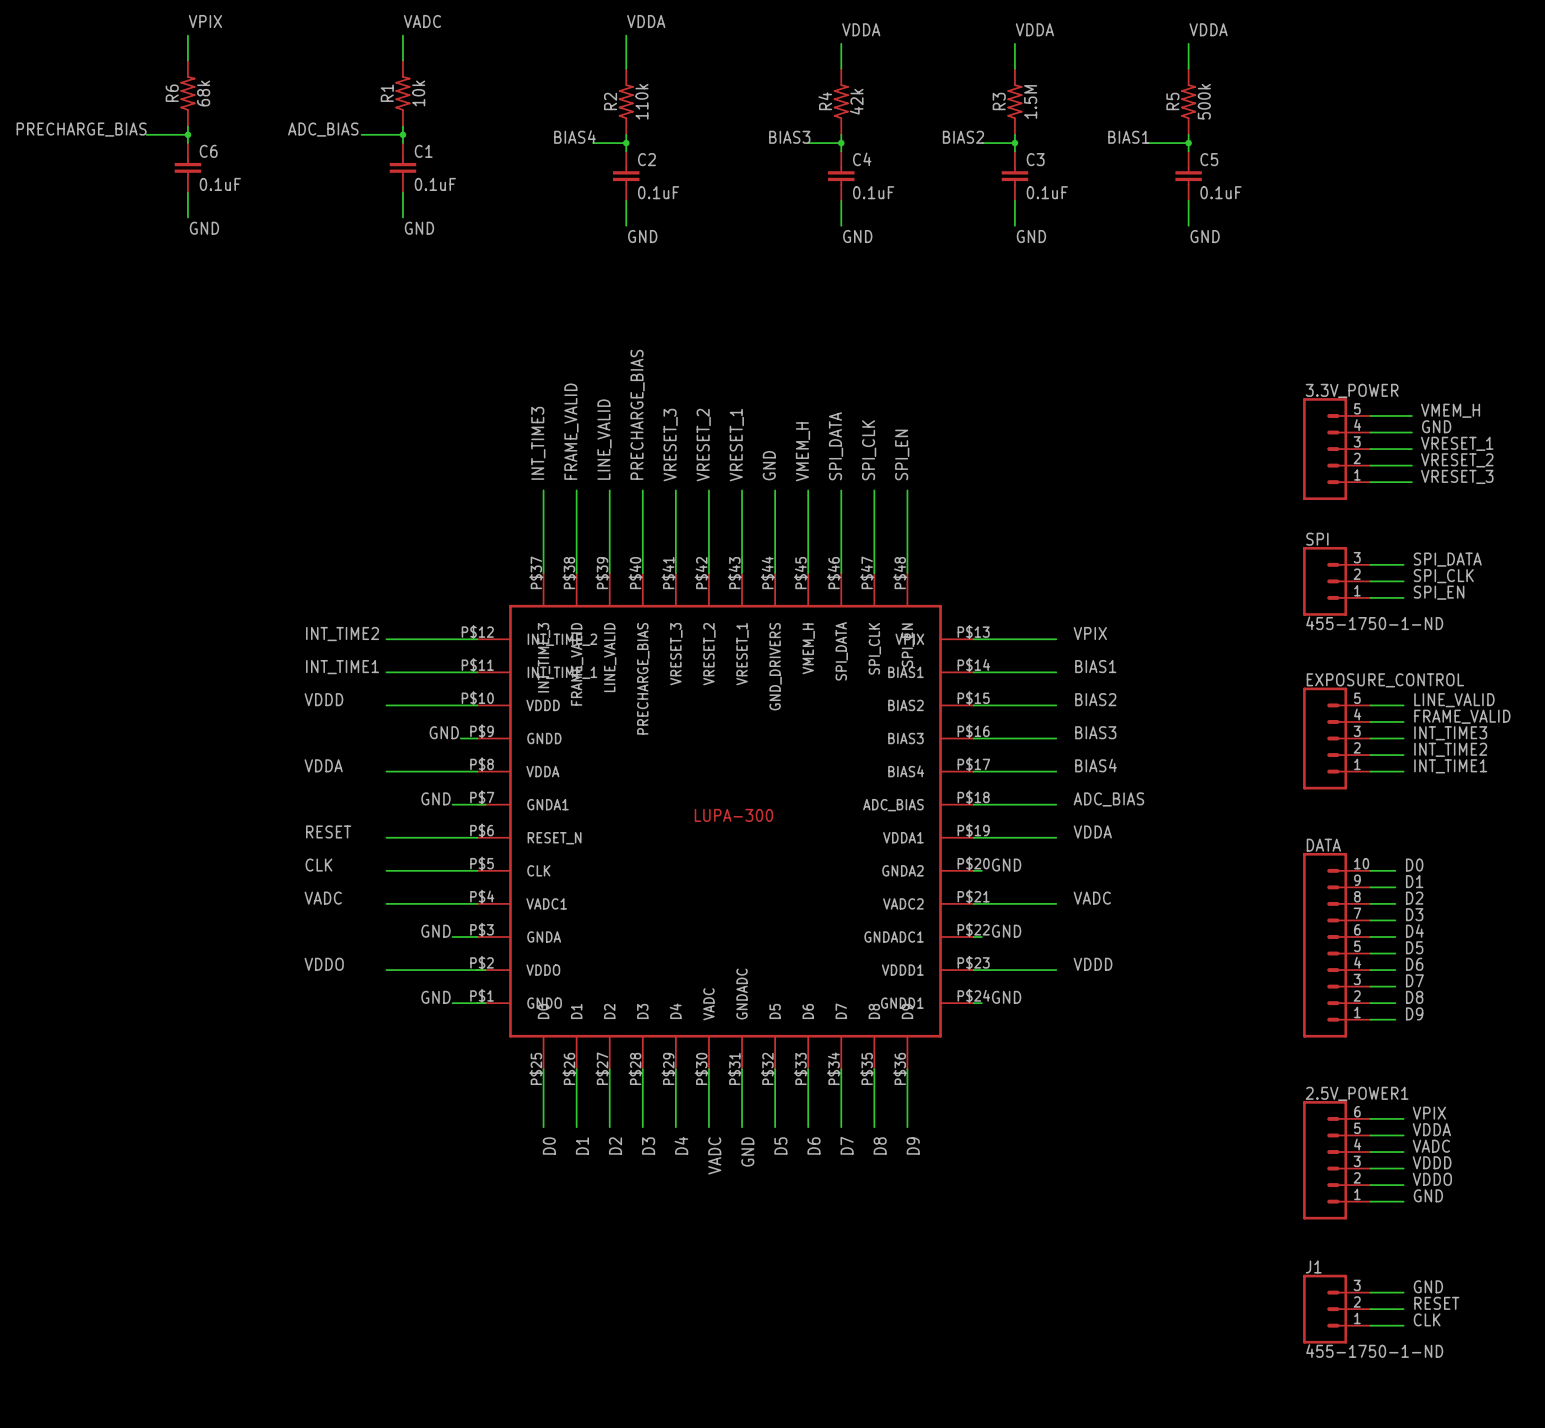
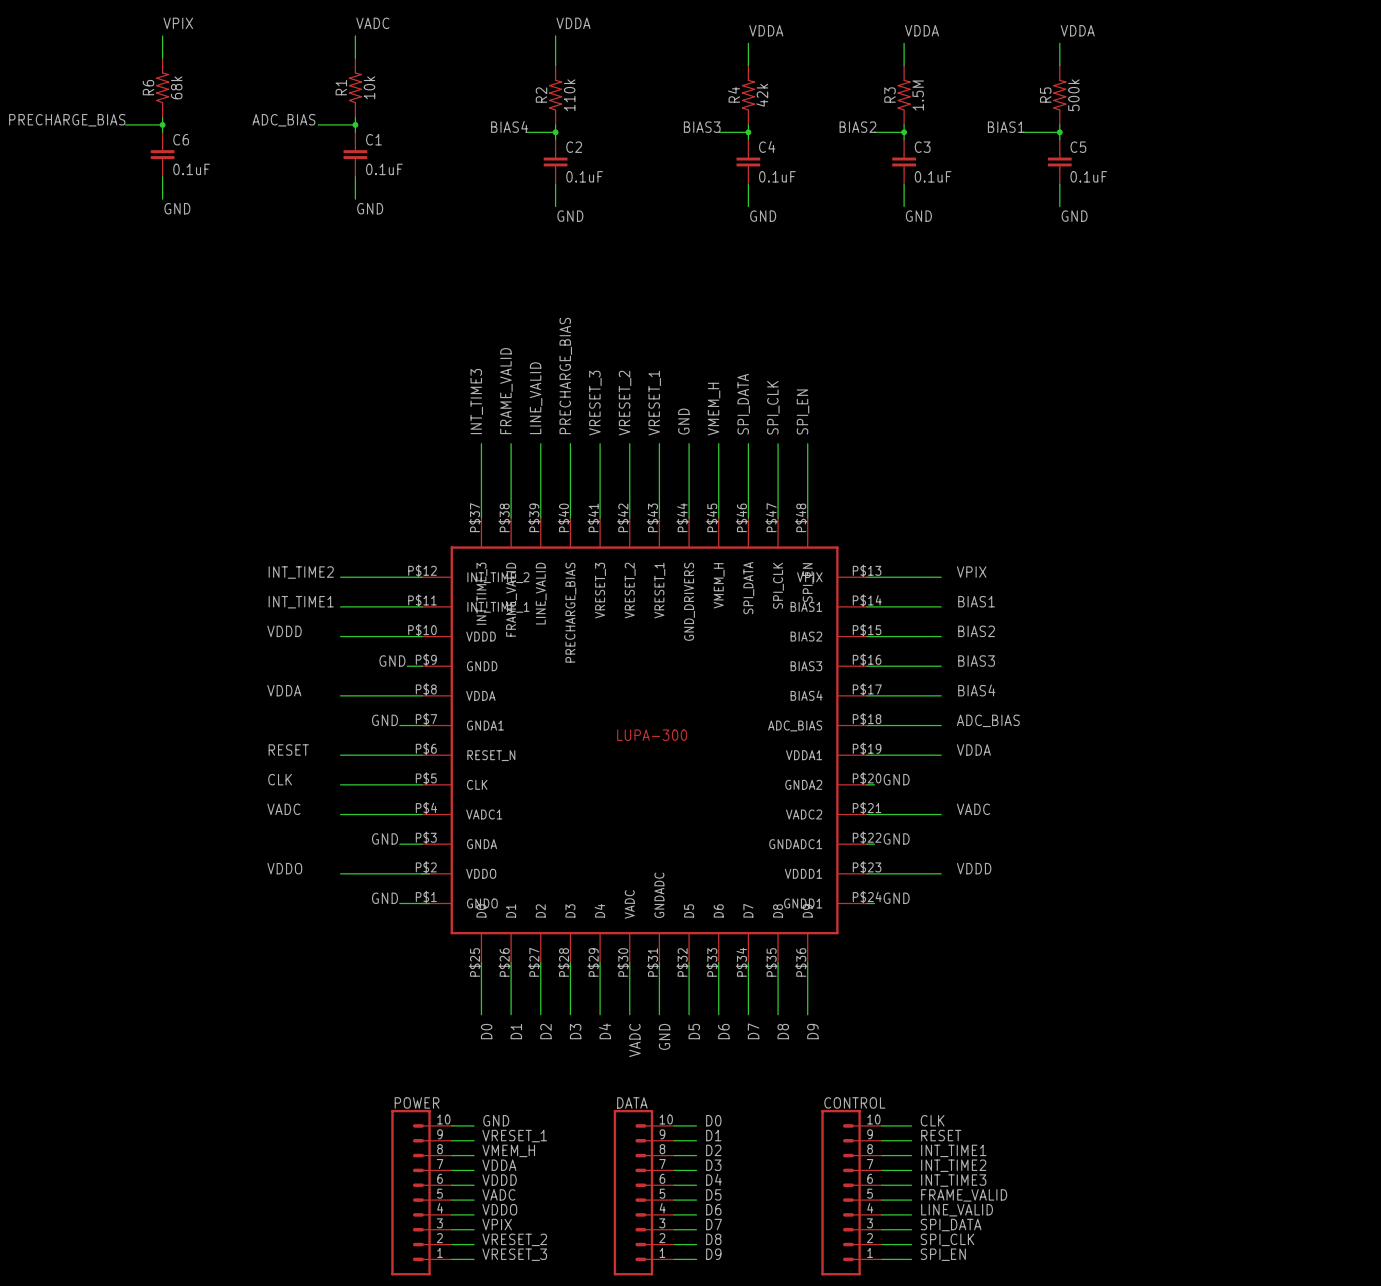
label: VMEM_H (1450, 410) -> none
wire: (1370, 415) (1411, 415) -> none
label: GND (1436, 426) -> none
wire: (1370, 432) (1411, 432) -> none
label: VRESET_1 (1457, 443) -> none
3.3V_POWER: (1336, 449) -> none
wire: (1370, 449) (1411, 449) -> none
label: VRESET_2 (1457, 460) -> none
wire: (1370, 465) (1411, 465) -> none
label: VRESET_3 (1457, 476) -> none
wire: (1370, 482) (1411, 482) -> none
label: SPI_DATA (1447, 559) -> none
wire: (1370, 564) (1403, 564) -> none
label: SPI_CLK (1443, 576) -> none
SPI: 455-1750-1-ND (1336, 581) -> none
wire: (1370, 581) (1403, 581) -> none
label: SPI_EN (1439, 592) -> none
wire: (1370, 597) (1403, 597) -> none
label: LINE_VALID (1454, 700) -> none
wire: (1370, 705) (1403, 705) -> none
label: FRAME_VALID (1462, 716) -> none
wire: (1370, 721) (1403, 721) -> none
label: INT_TIME3 (1450, 733) -> none
EXPOSURE_CONTROL: (1336, 738) -> none
wire: (1370, 738) (1403, 738) -> none
label: INT_TIME2 (1450, 749) -> none
wire: (1370, 755) (1403, 755) -> none
label: INT_TIME1 (1450, 766) -> none
wire: (1370, 771) (1403, 771) -> none
label: D0 (1414, 865) -> none
wire: (1370, 870) (1395, 870) -> none
label: D1 (1414, 881) -> none
wire: (1370, 887) (1395, 887) -> none
label: D2 (1414, 898) -> none
wire: (1370, 903) (1395, 903) -> none
label: D3 (1414, 914) -> none
wire: (1370, 920) (1395, 920) -> none
label: D4 (1414, 930) -> none
wire: (1370, 936) (1395, 936) -> none
DATA: (1336, 945) -> none
label: D5 (1414, 947) -> none
wire: (1370, 953) (1395, 953) -> none
label: D6 (1414, 964) -> none
wire: (1370, 970) (1395, 970) -> none
label: D7 (1414, 980) -> none
wire: (1370, 986) (1395, 986) -> none
label: D8 (1414, 997) -> none
wire: (1370, 1003) (1395, 1003) -> none
label: D9 (1414, 1013) -> none
wire: (1370, 1019) (1395, 1019) -> none
label: VPIX (1429, 1113) -> none
wire: (1370, 1118) (1403, 1118) -> none
label: VDDA (1431, 1129) -> none
wire: (1370, 1135) (1403, 1135) -> none
label: VADC (1431, 1146) -> none
wire: (1370, 1152) (1403, 1152) -> none
2.5V_POWER1: (1336, 1160) -> none
label: VDDD (1432, 1162) -> none
wire: (1370, 1168) (1403, 1168) -> none
label: VDDO (1432, 1179) -> none
wire: (1370, 1185) (1403, 1185) -> none
label: GND (1428, 1195) -> none
wire: (1370, 1201) (1403, 1201) -> none
label: none -> GND (496, 1120)
label: none -> D0 (713, 1120)
label: none -> CLK (932, 1120)
wire: none -> (451, 1125) (474, 1125)
wire: none -> (674, 1125) (696, 1125)
wire: none -> (881, 1125) (911, 1125)
label: none -> VRESET_1 (514, 1136)
label: none -> D1 (713, 1135)
label: none -> RESET (941, 1135)
wire: none -> (451, 1140) (474, 1140)
wire: none -> (674, 1140) (696, 1140)
wire: none -> (881, 1140) (911, 1140)
label: none -> D2 (713, 1150)
label: none -> VMEM_H (508, 1150)
label: none -> INT_TIME1 (953, 1150)
wire: none -> (451, 1155) (474, 1155)
wire: none -> (674, 1155) (696, 1155)
wire: none -> (881, 1155) (911, 1155)
label: GND (1428, 1286) -> none
wire: (1370, 1292) (1403, 1292) -> none
label: none -> VDDA (499, 1165)
label: none -> D3 (713, 1165)
label: none -> INT_TIME2 (953, 1165)
wire: none -> (451, 1170) (474, 1170)
wire: none -> (674, 1170) (696, 1170)
wire: none -> (881, 1170) (911, 1170)
label: RESET (1436, 1303) -> none
J1: 455-1750-1-ND (1336, 1309) -> none
wire: (1370, 1309) (1403, 1309) -> none
label: none -> VDDD (499, 1180)
label: none -> D4 (714, 1179)
label: none -> INT_TIME3 (953, 1180)
wire: none -> (451, 1185) (474, 1185)
wire: none -> (674, 1185) (696, 1185)
wire: none -> (881, 1185) (911, 1185)
label: CLK (1427, 1319) -> none
POWER: none -> (421, 1192)
DATA: none -> (643, 1192)
CONTROL: none -> (851, 1192)
wire: (1370, 1325) (1403, 1325) -> none
label: none -> VADC (498, 1194)
label: none -> D5 (713, 1194)
label: none -> FRAME_VALID (964, 1195)
wire: none -> (451, 1200) (474, 1200)
wire: none -> (674, 1200) (696, 1200)
wire: none -> (881, 1200) (911, 1200)
label: none -> VDDO (499, 1209)
label: none -> D6 (713, 1209)
label: none -> LINE_VALID (957, 1210)
wire: none -> (451, 1214) (474, 1214)
wire: none -> (674, 1214) (696, 1214)
wire: none -> (881, 1214) (911, 1214)
label: none -> VPIX (497, 1224)
label: none -> D7 (714, 1224)
label: none -> SPI_DATA (951, 1225)
wire: none -> (451, 1229) (474, 1229)
wire: none -> (674, 1229) (696, 1229)
wire: none -> (881, 1229) (911, 1229)
label: none -> D8 (713, 1239)
label: none -> VRESET_2 (514, 1239)
label: none -> SPI_CLK (947, 1239)
wire: none -> (451, 1244) (474, 1244)
wire: none -> (674, 1244) (696, 1244)
wire: none -> (881, 1244) (911, 1244)
label: none -> VRESET_3 (514, 1254)
label: none -> D9 (713, 1254)
label: none -> SPI_EN (943, 1254)
wire: none -> (451, 1259) (474, 1259)
wire: none -> (674, 1259) (696, 1259)
wire: none -> (881, 1259) (911, 1259)

